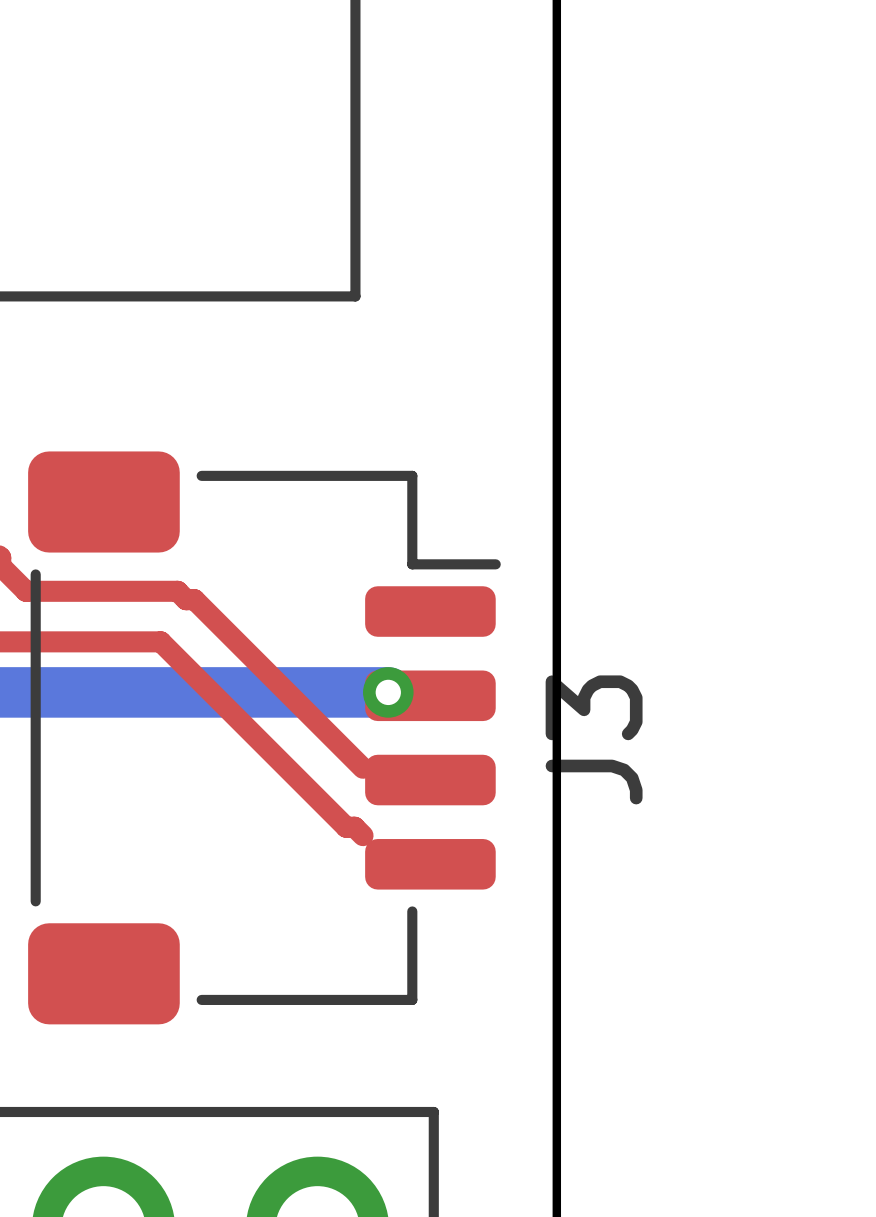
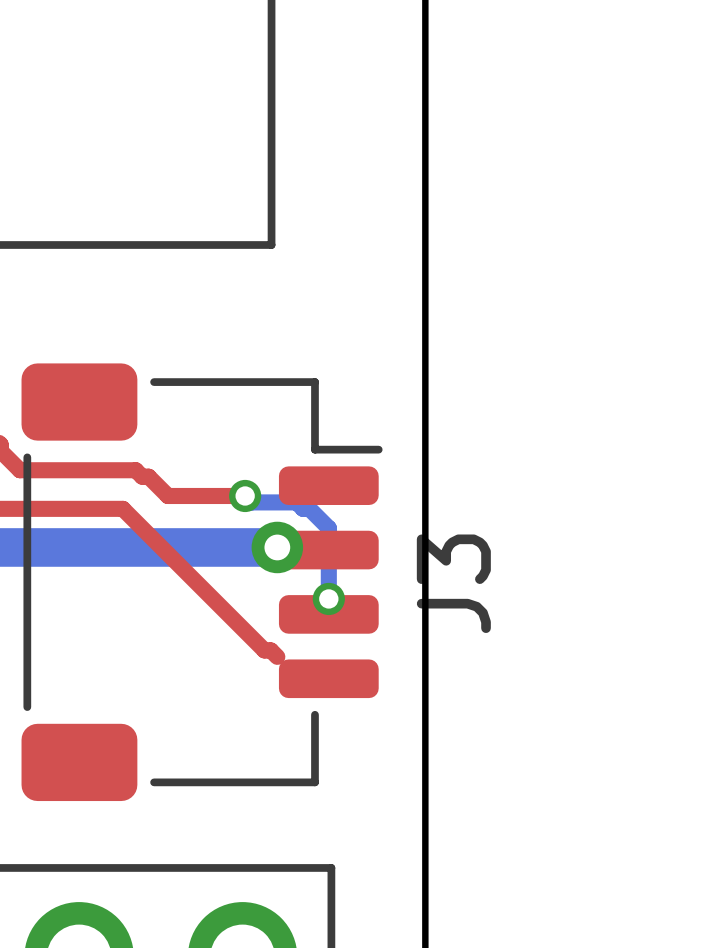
top track: (219, 625) (363, 768) -> (167, 495) (245, 495)
bottom track: none -> (245, 495) (251, 502) (296, 502) (303, 508) (309, 508) (328, 528) (328, 598)
via: none -> (245, 495)
via size: [363, 667, 414, 718] -> [251, 521, 304, 574]
via: none -> (328, 598)

